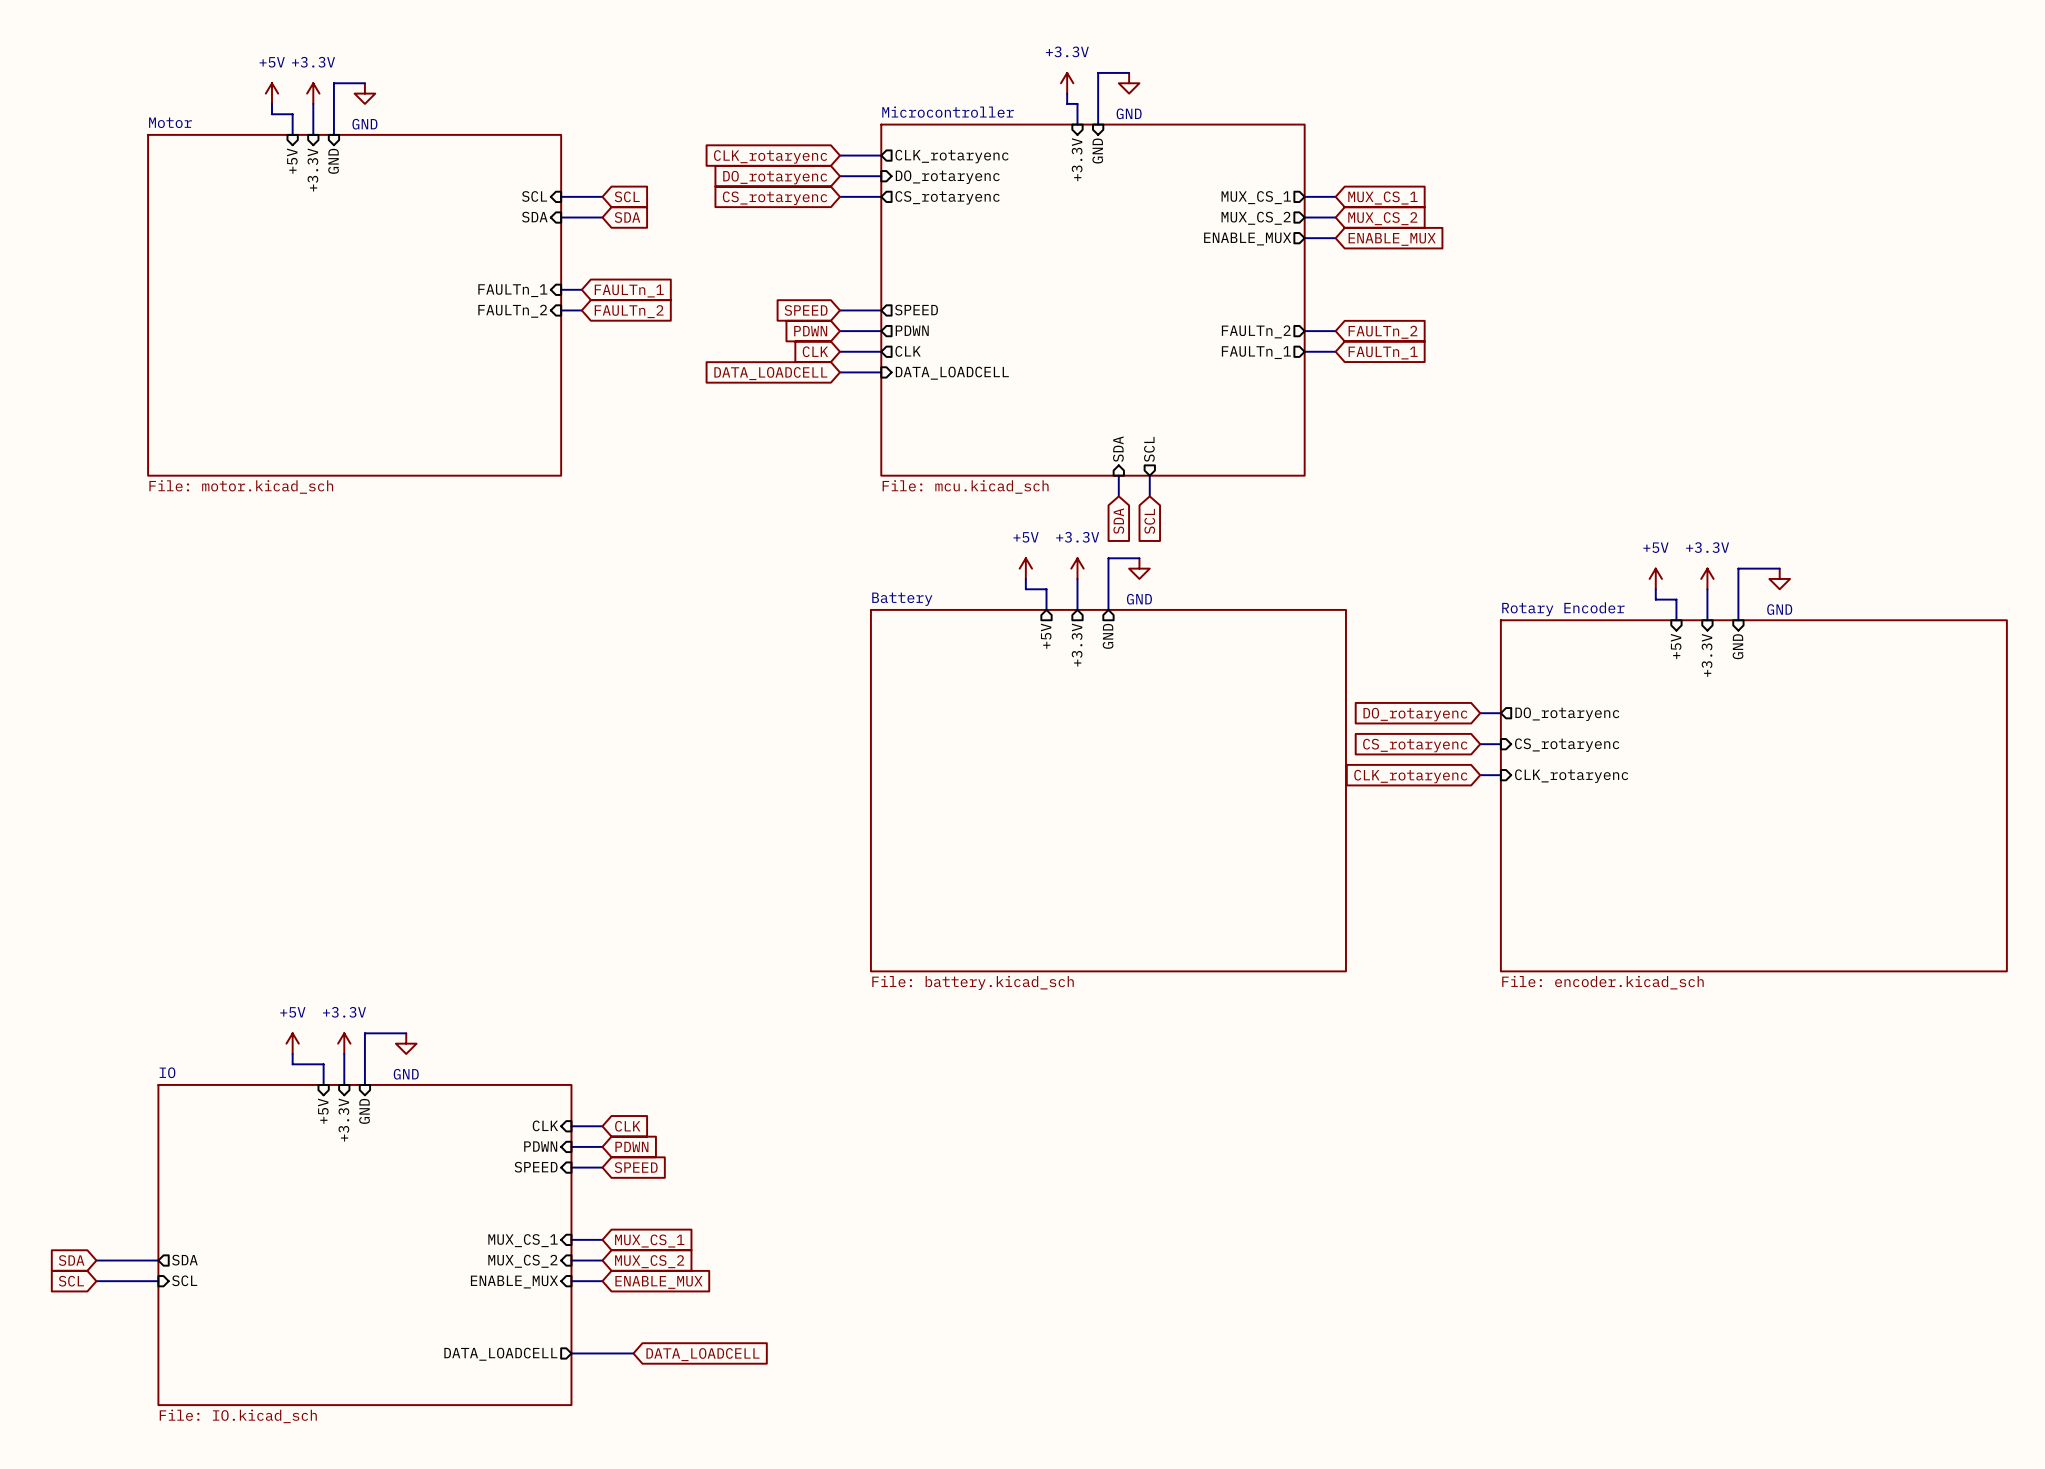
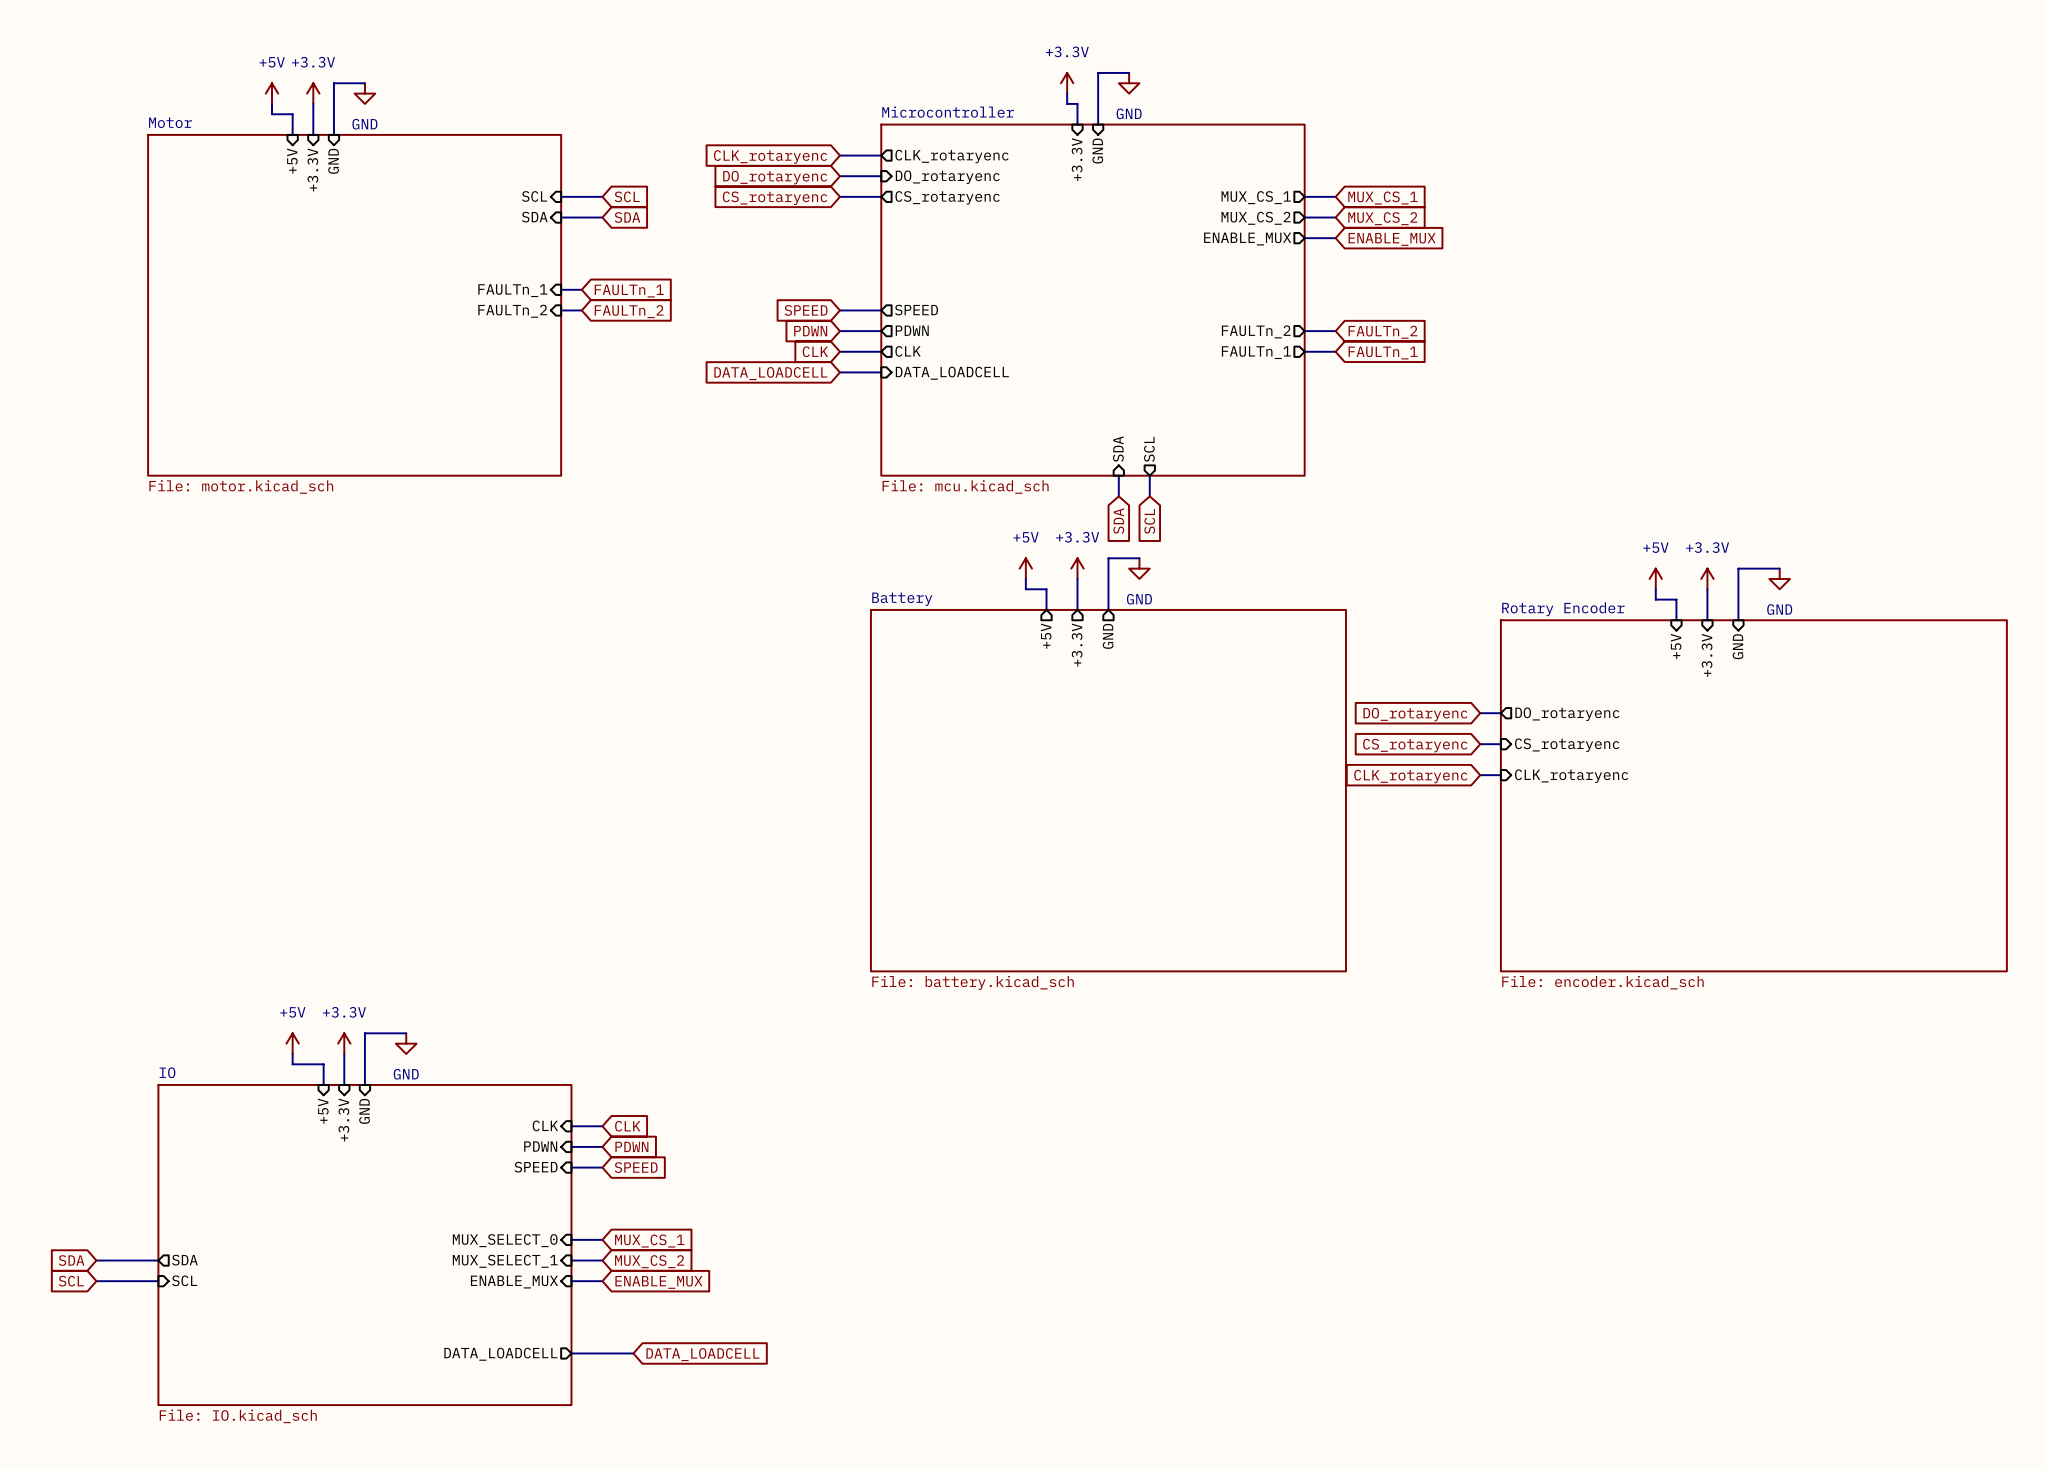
sheet pin: MUX_CS_1 (523, 1240) -> MUX_SELECT_0 (505, 1240)
sheet pin: MUX_CS_2 (522, 1261) -> MUX_SELECT_1 (505, 1261)

